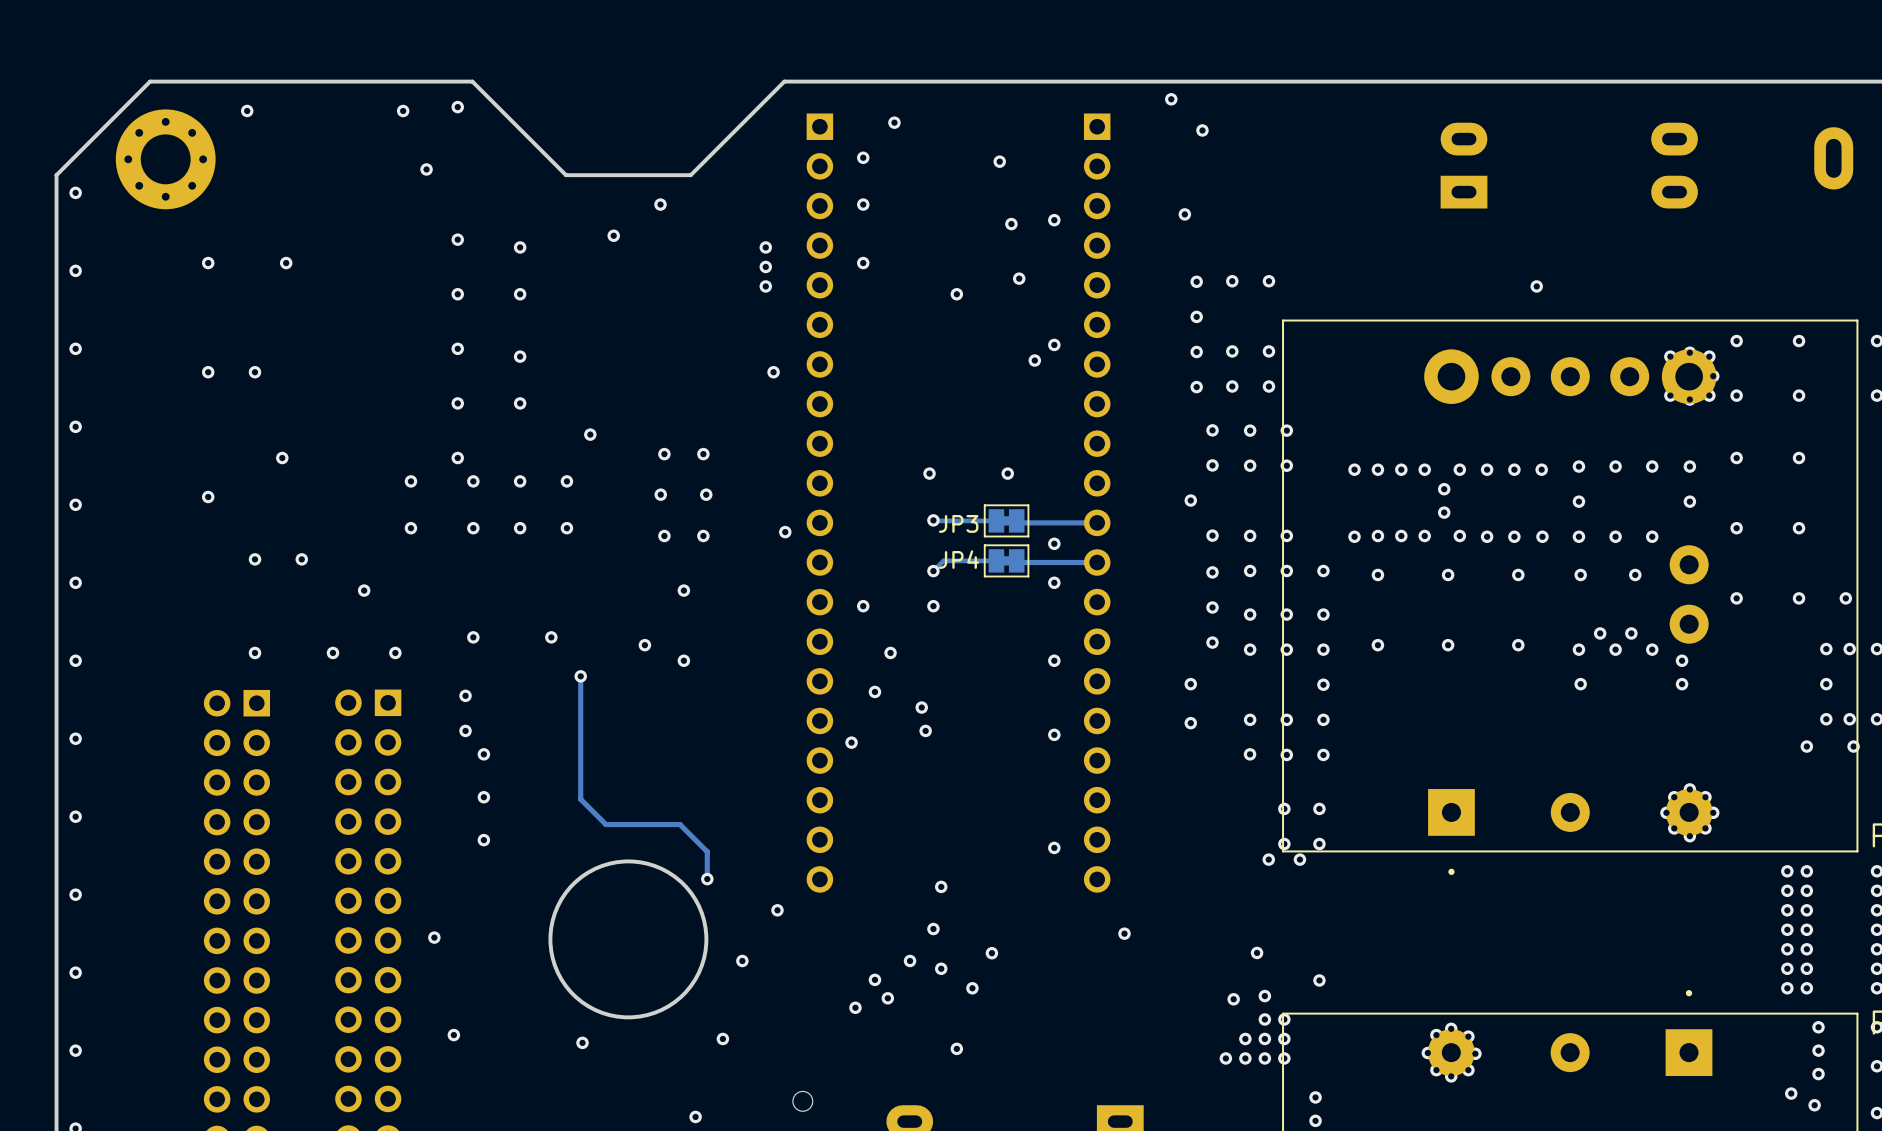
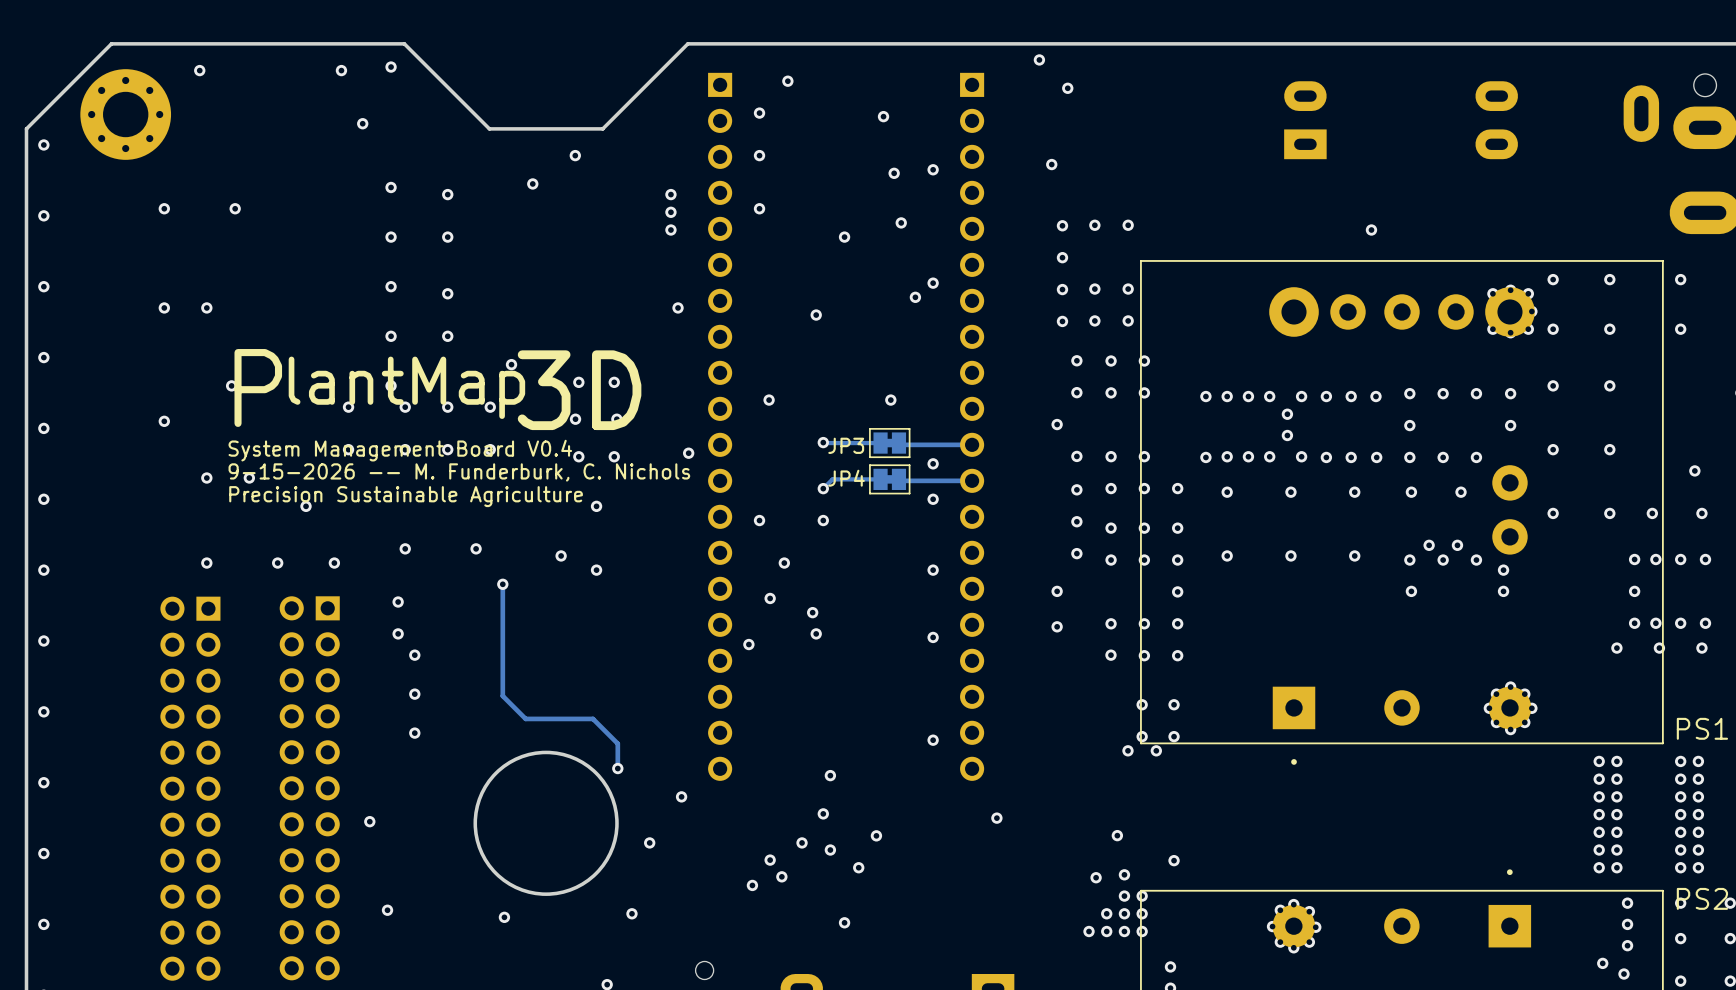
via: none -> (816, 315)
text: none -> P (258, 387)
text: none -> lantMap (406, 387)
text: none -> 3D (579, 390)
via: none -> (769, 400)
via: (929, 473) -> none
text: none -> System Management Board V0.4 (400, 450)
text: none -> 9-15-2026 -- M. Funderburk, C. Nichols (459, 472)
text: none -> Precision Sustainable Agriculture (406, 496)

